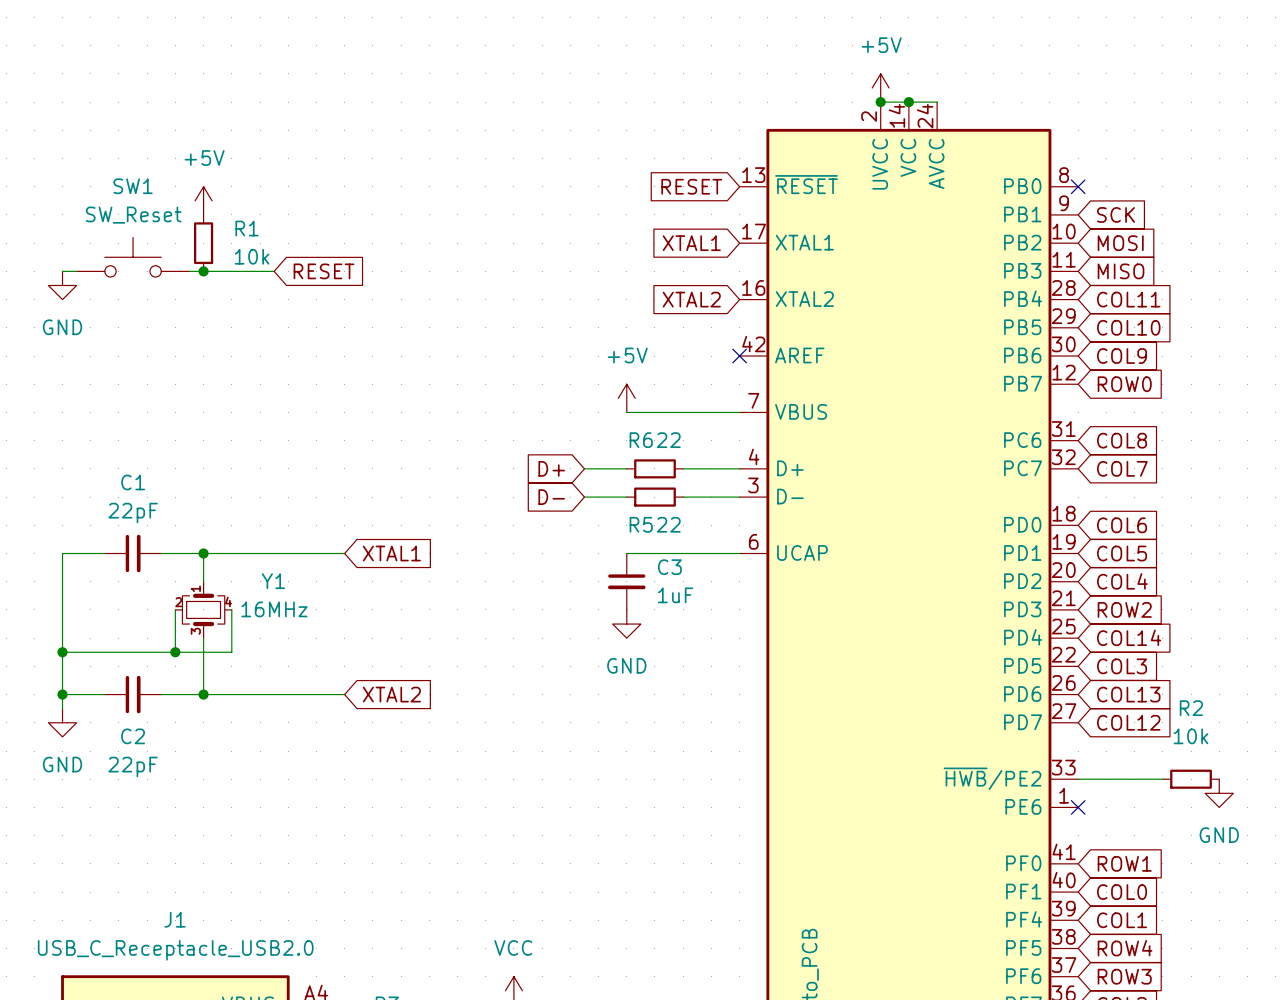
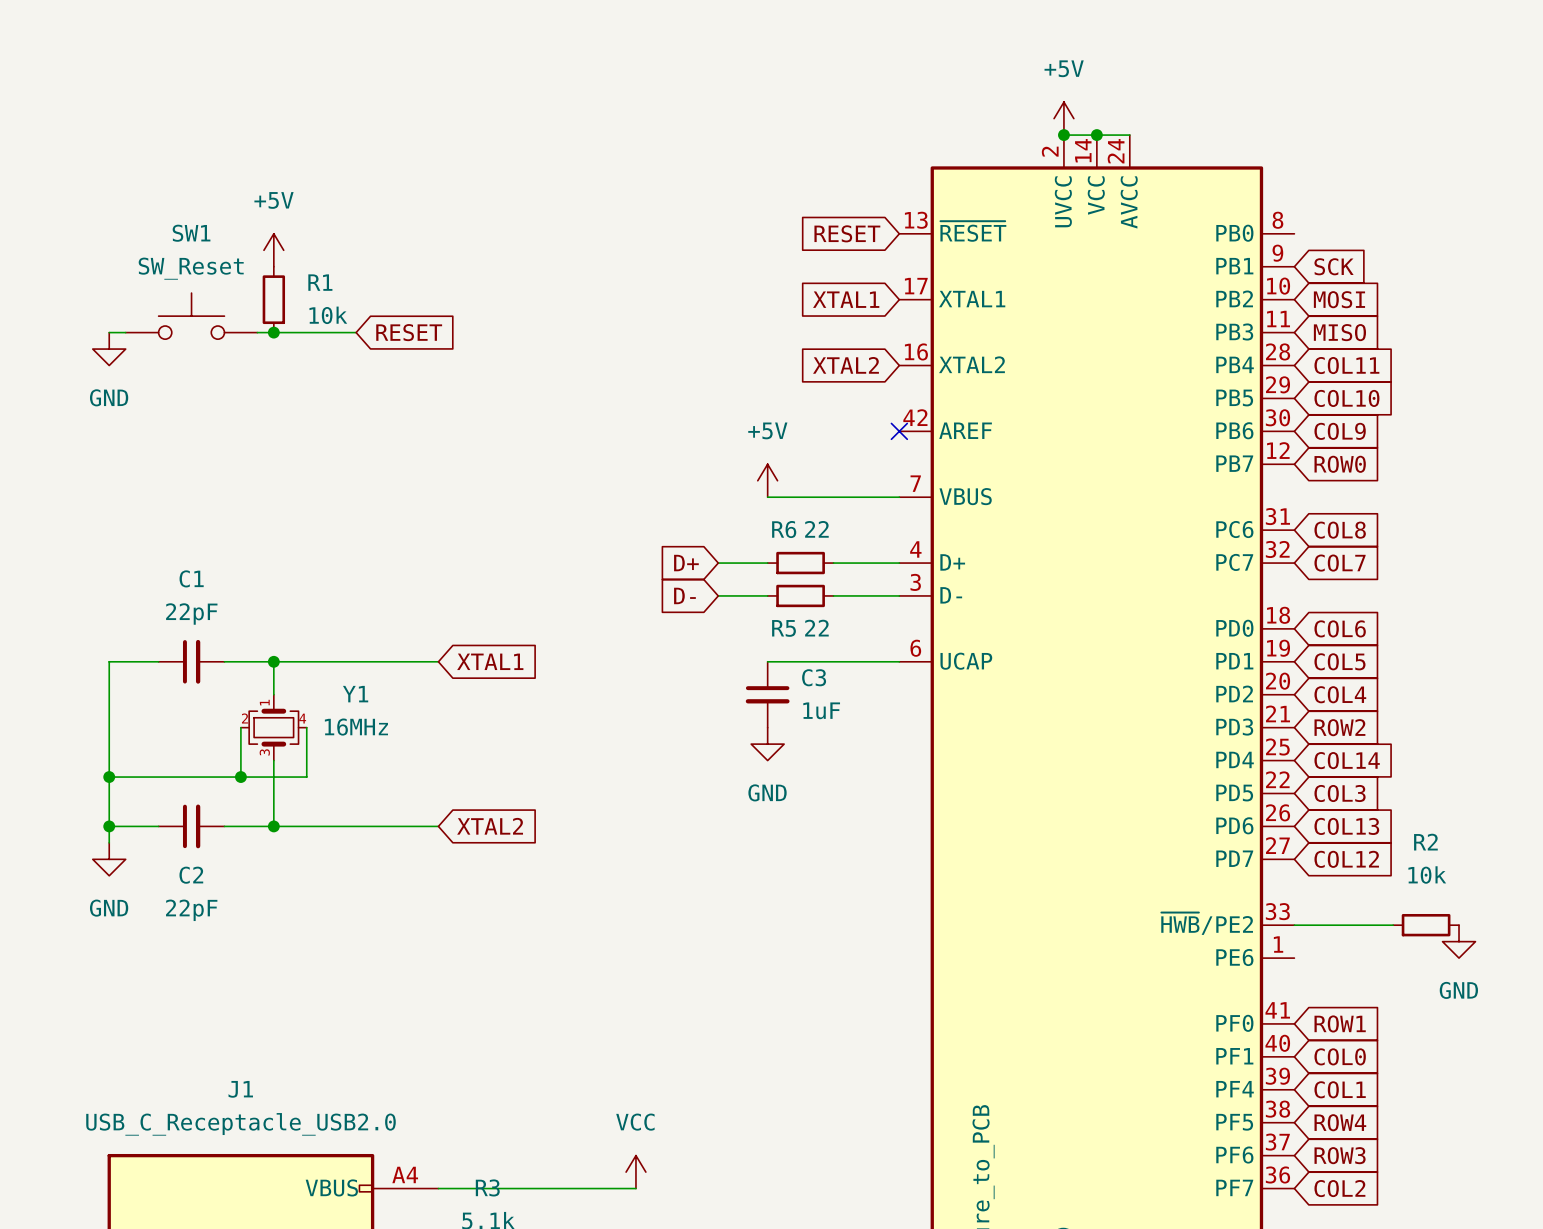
no-connect mark: (1078, 186) -> none
no-connect mark: (1078, 807) -> none

